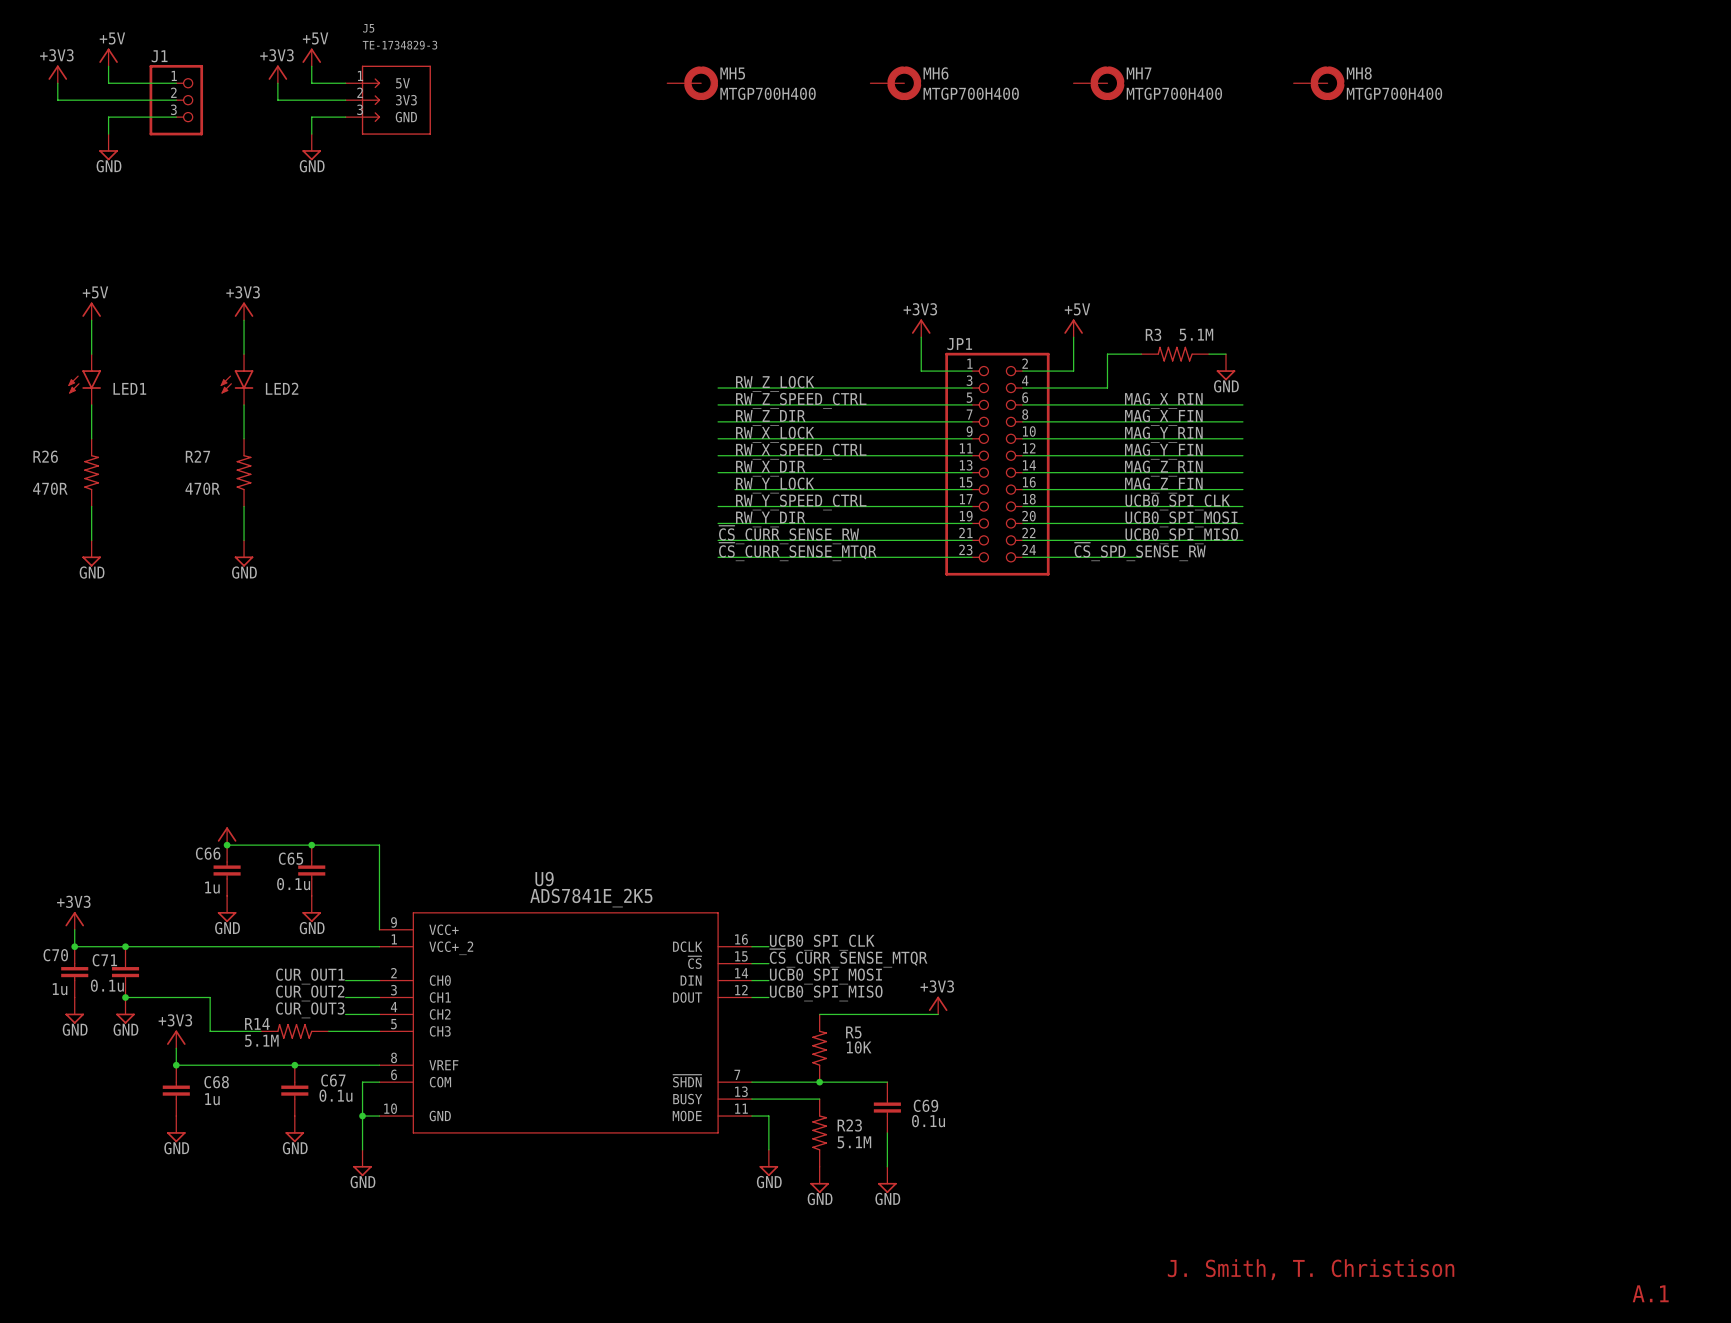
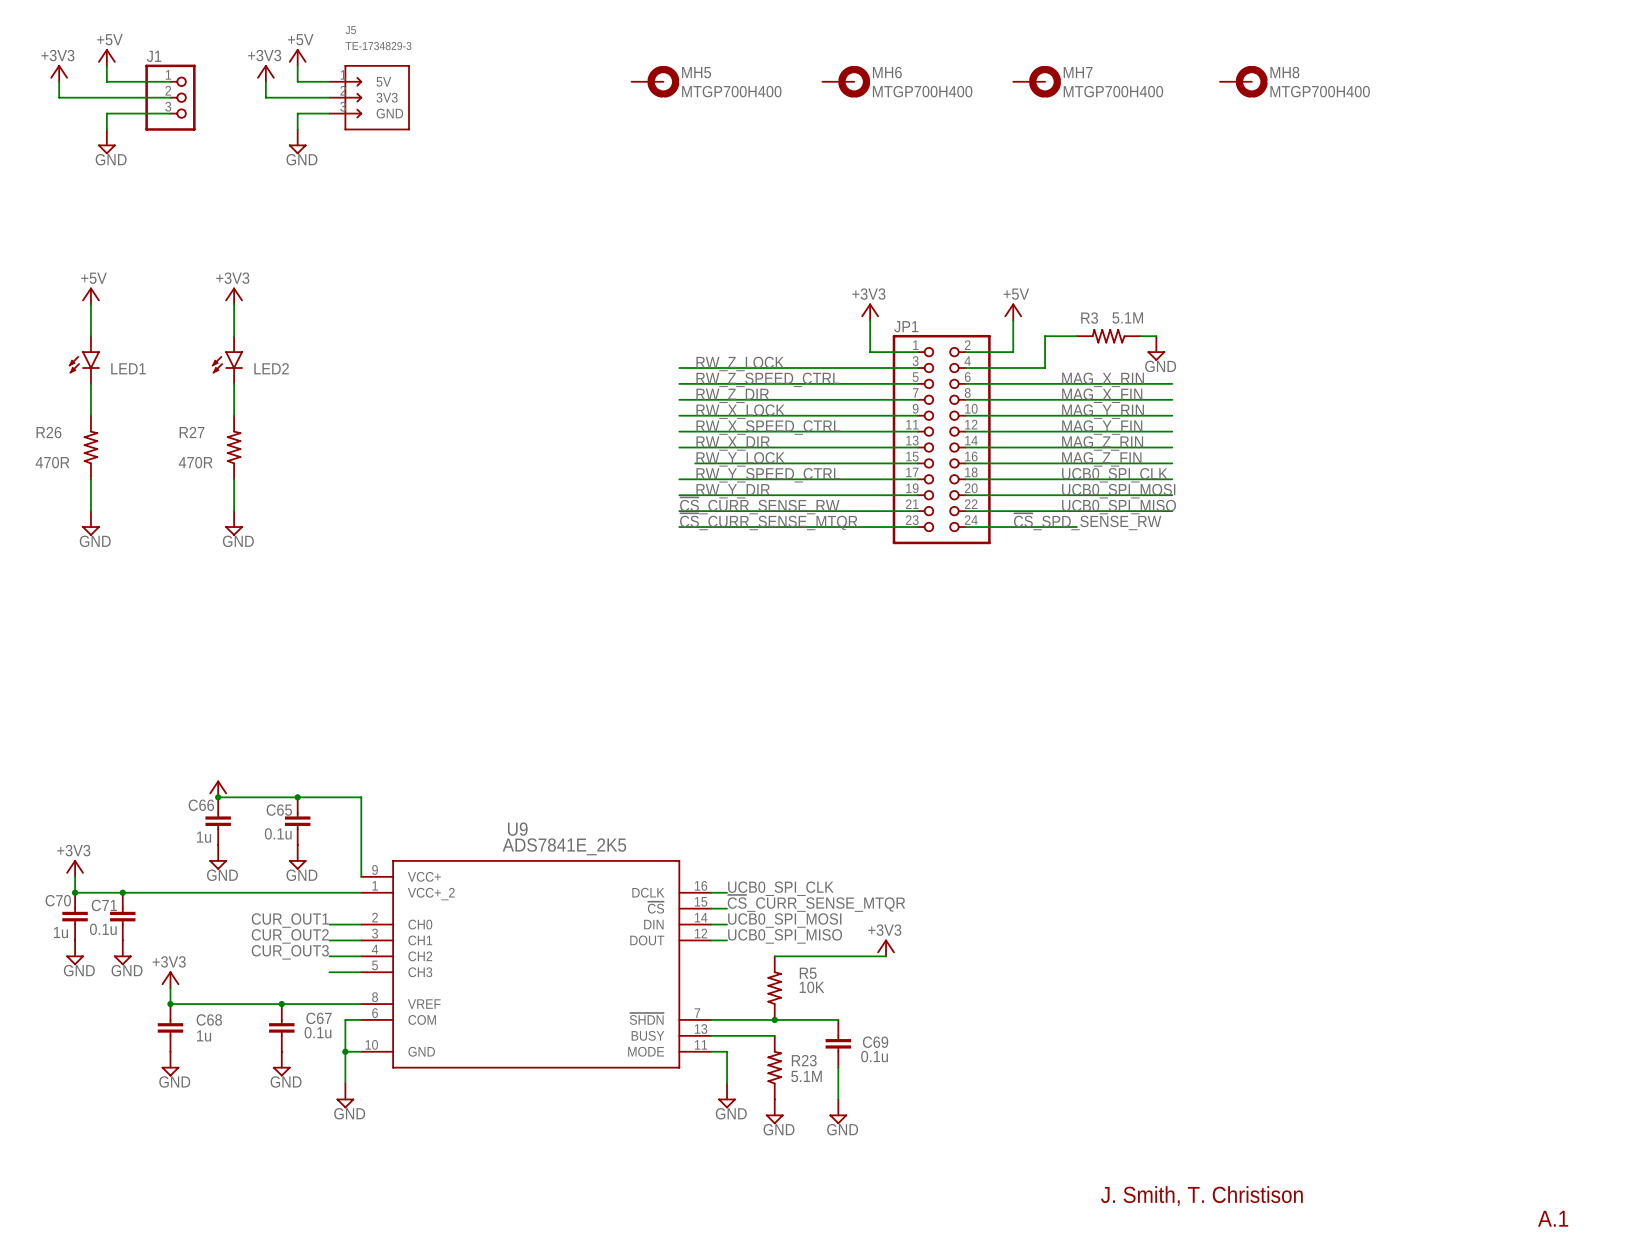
wire: (125, 997) (210, 997) (210, 1031) (260, 1031) -> none
junction: (125, 997) -> none
R14: 5.1M (294, 1031) -> none
wire: (328, 1031) (345, 1031) -> none

